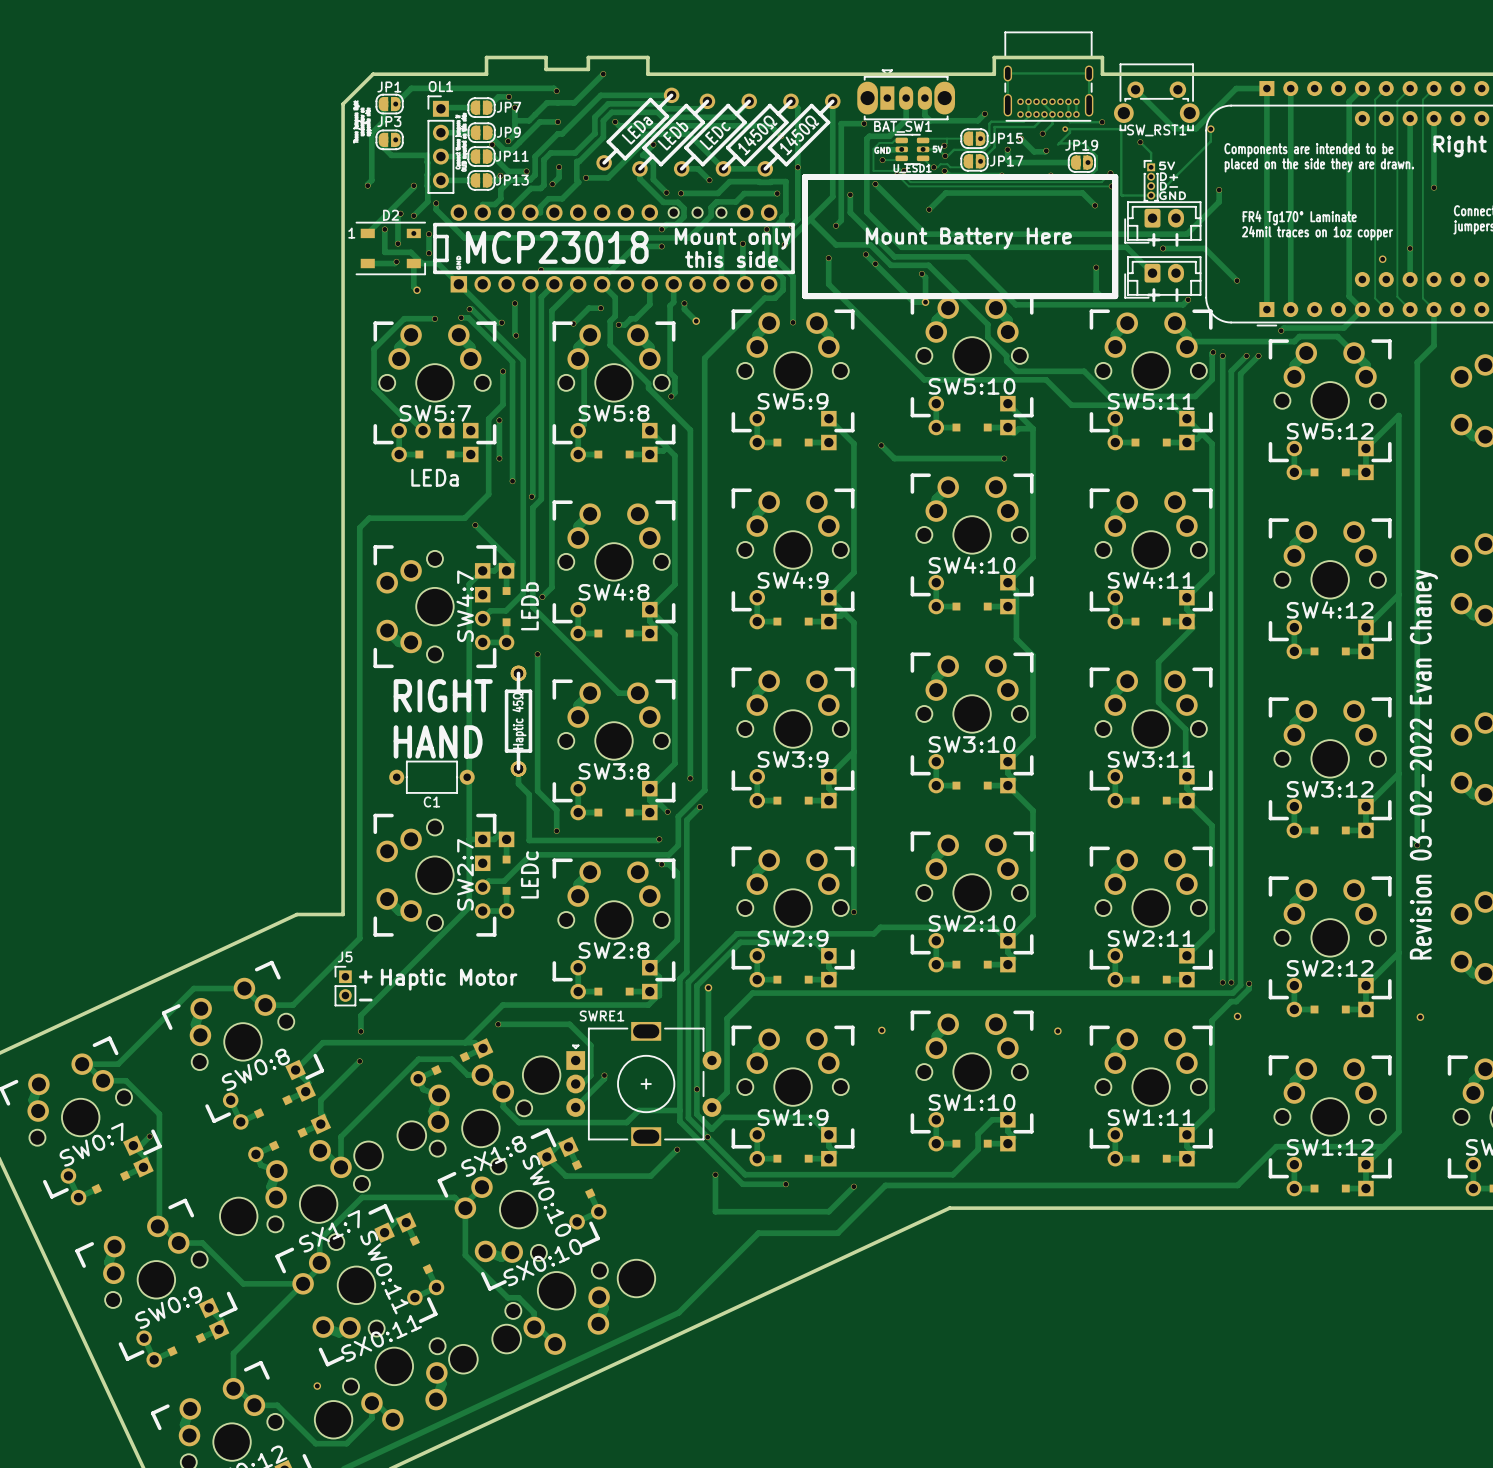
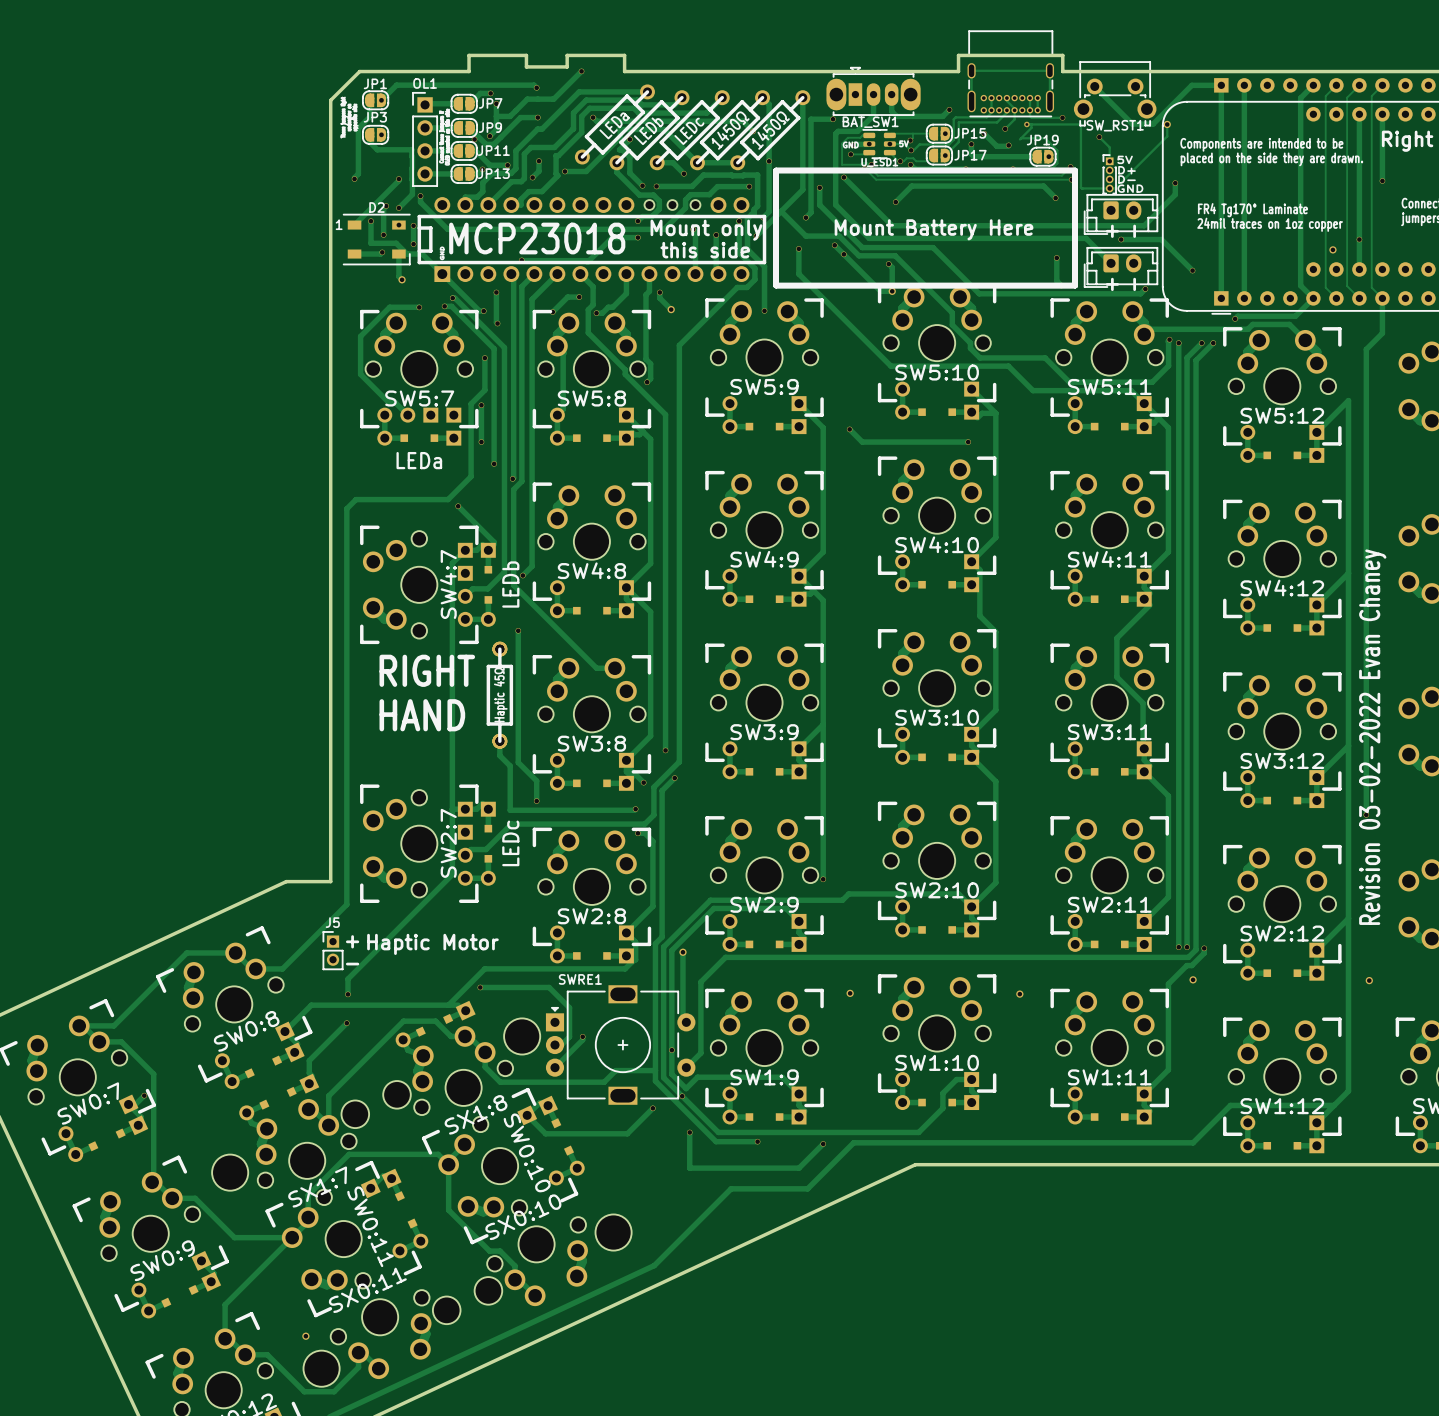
C1: (431, 777) -> none

